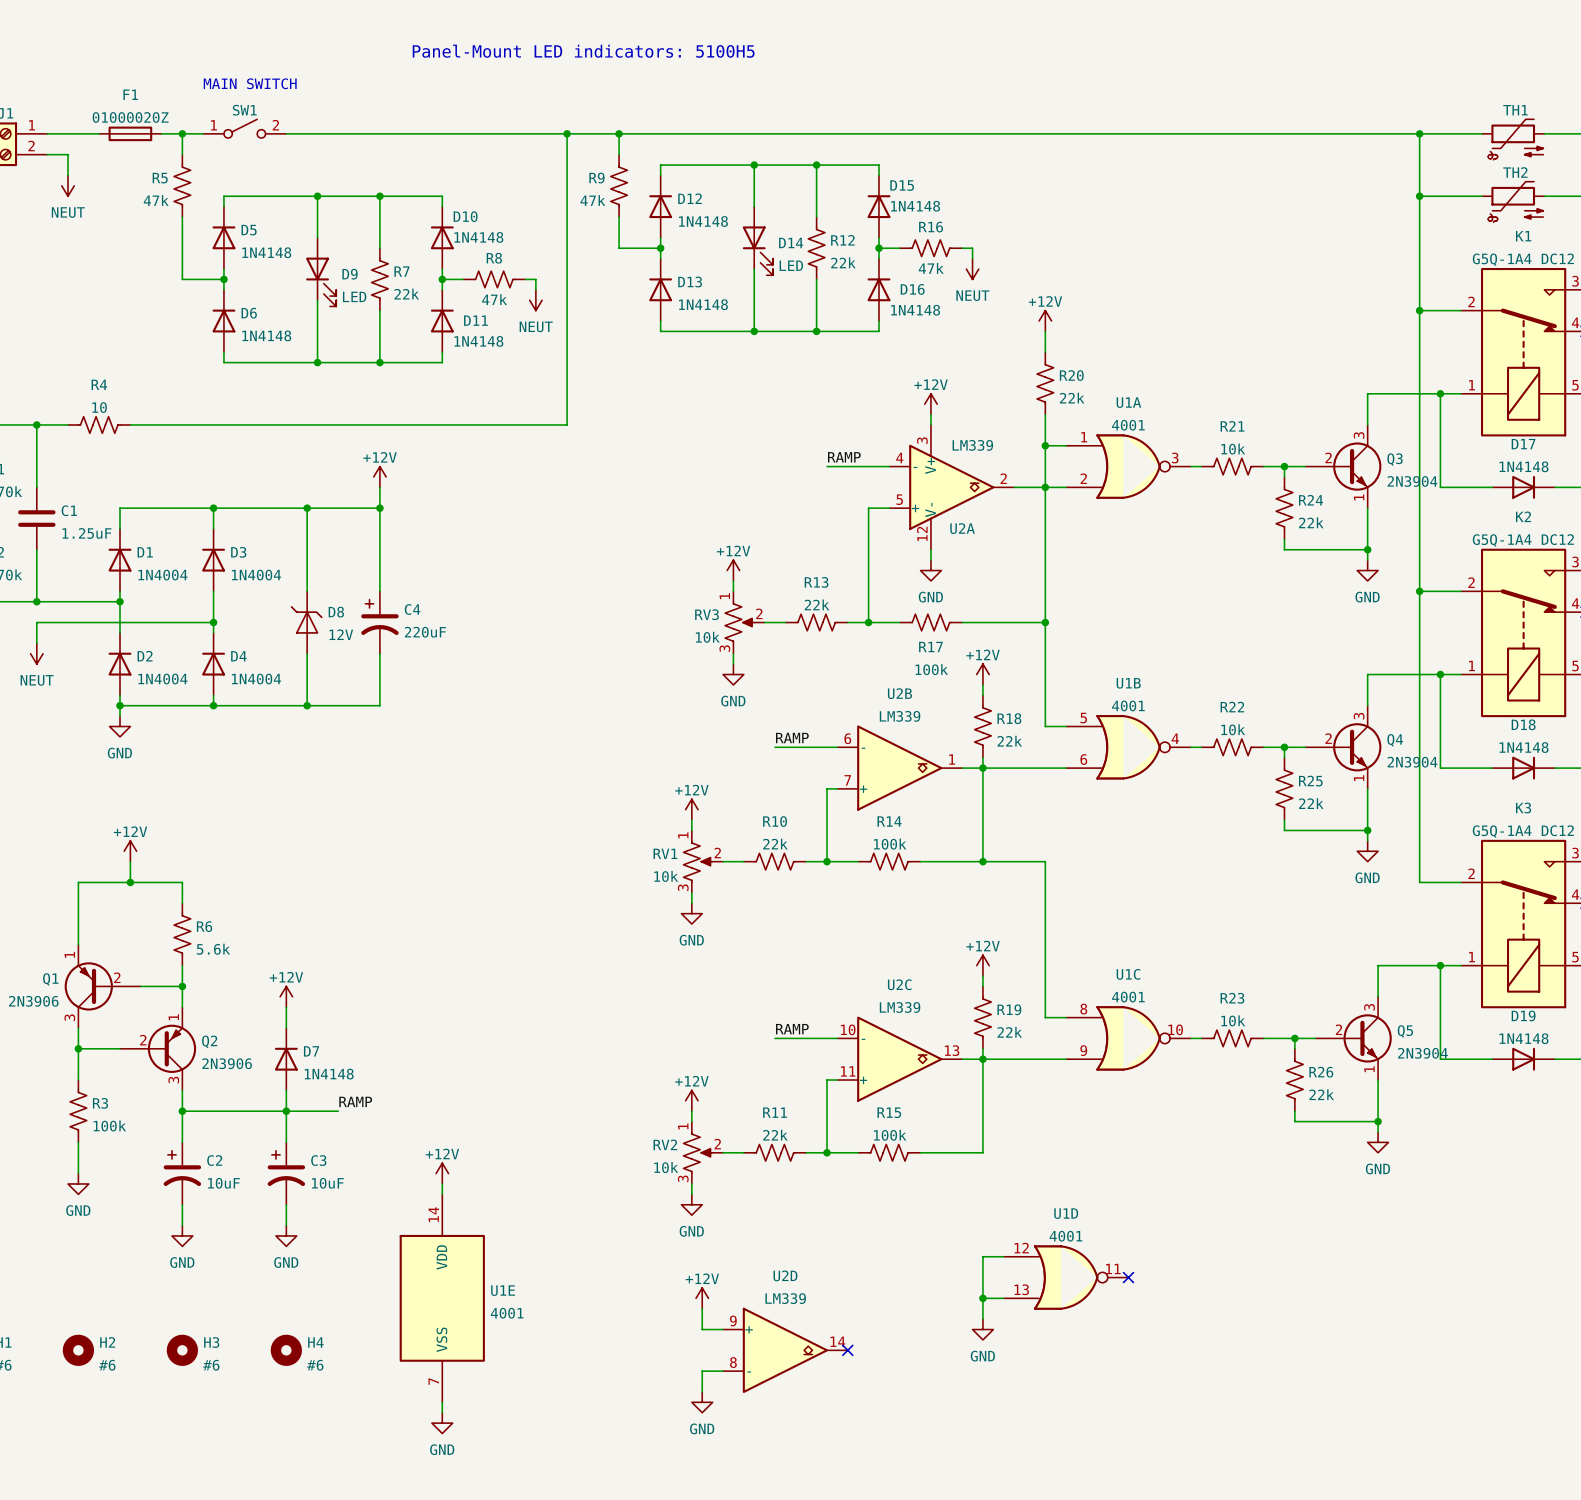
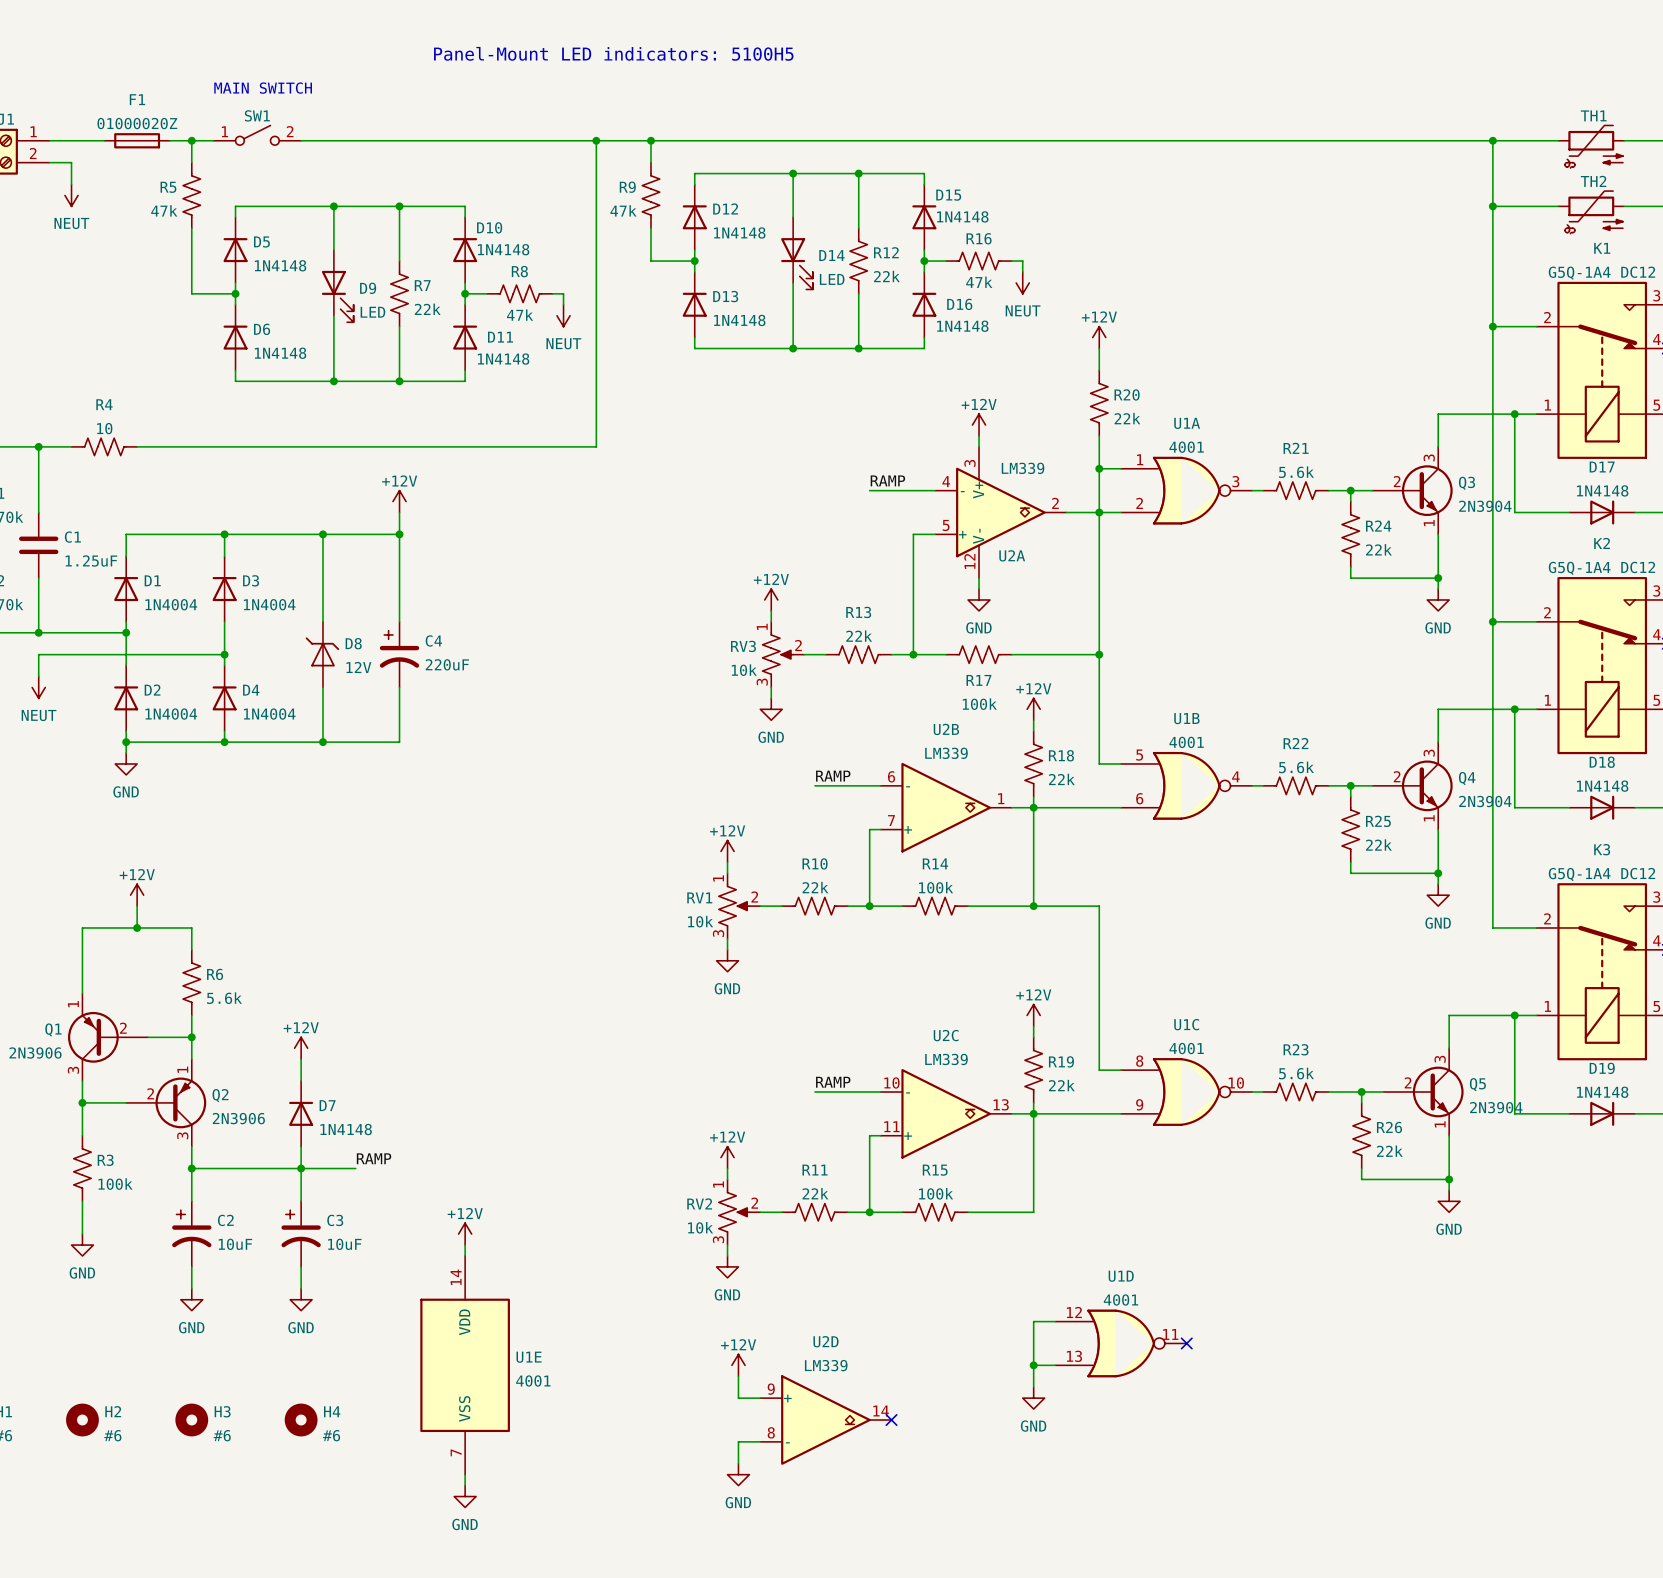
R21 value: 10k (1233, 449) -> 5.6k (1296, 472)
R22 value: 10k (1233, 729) -> 5.6k (1296, 767)
R23 value: 10k (1233, 1020) -> 5.6k (1296, 1073)

